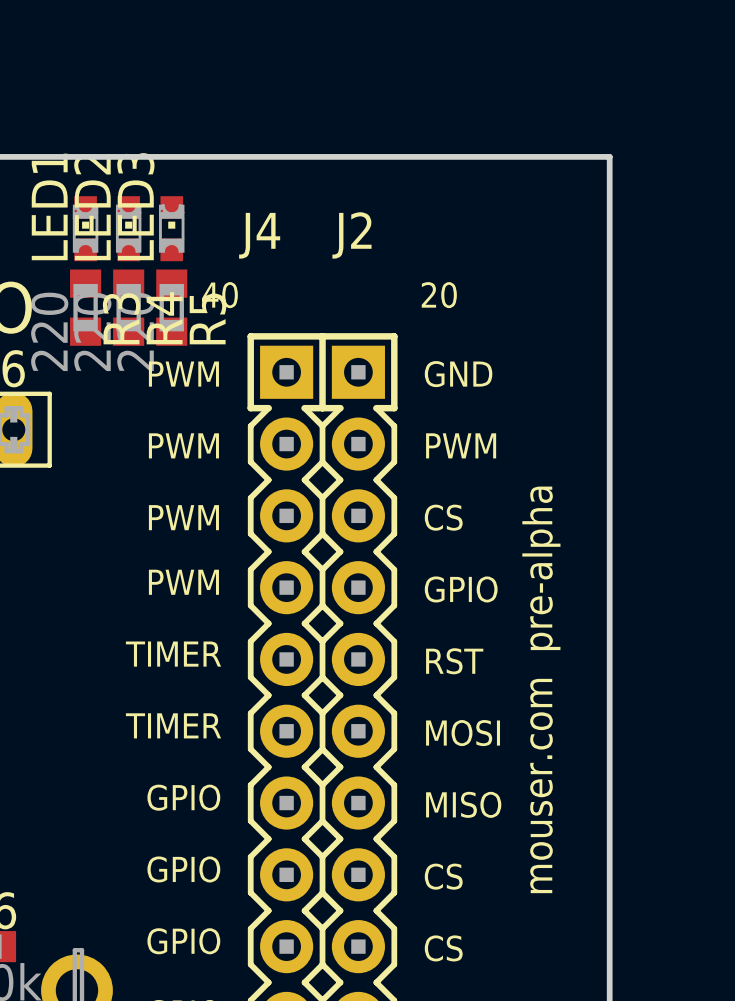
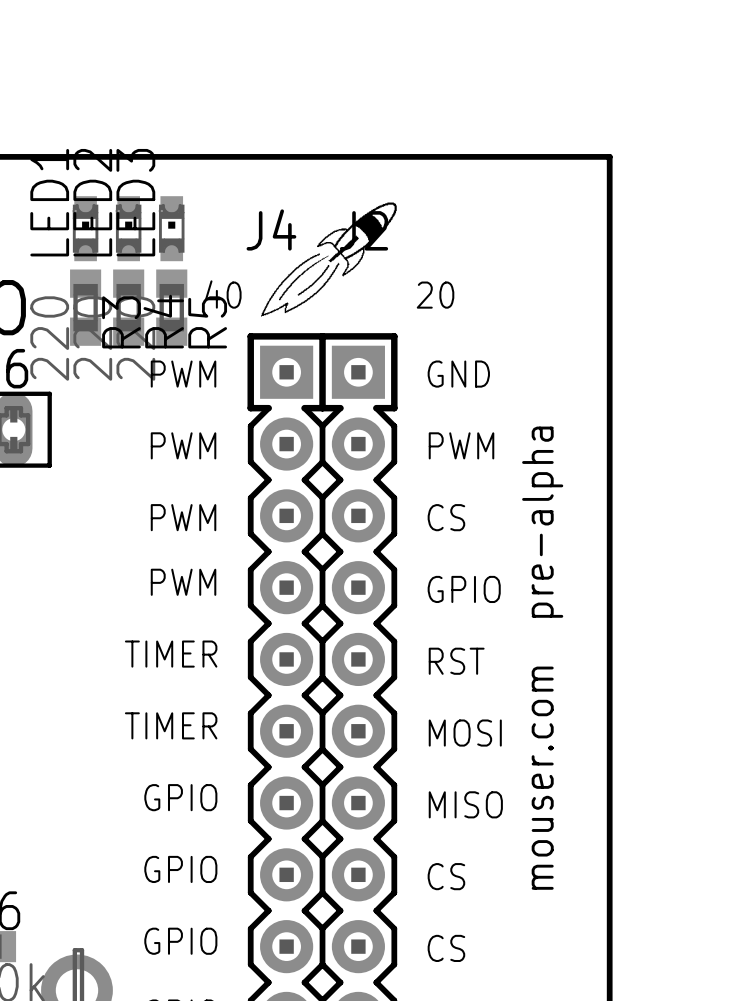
drawing: none -> [261, 202, 397, 317]

